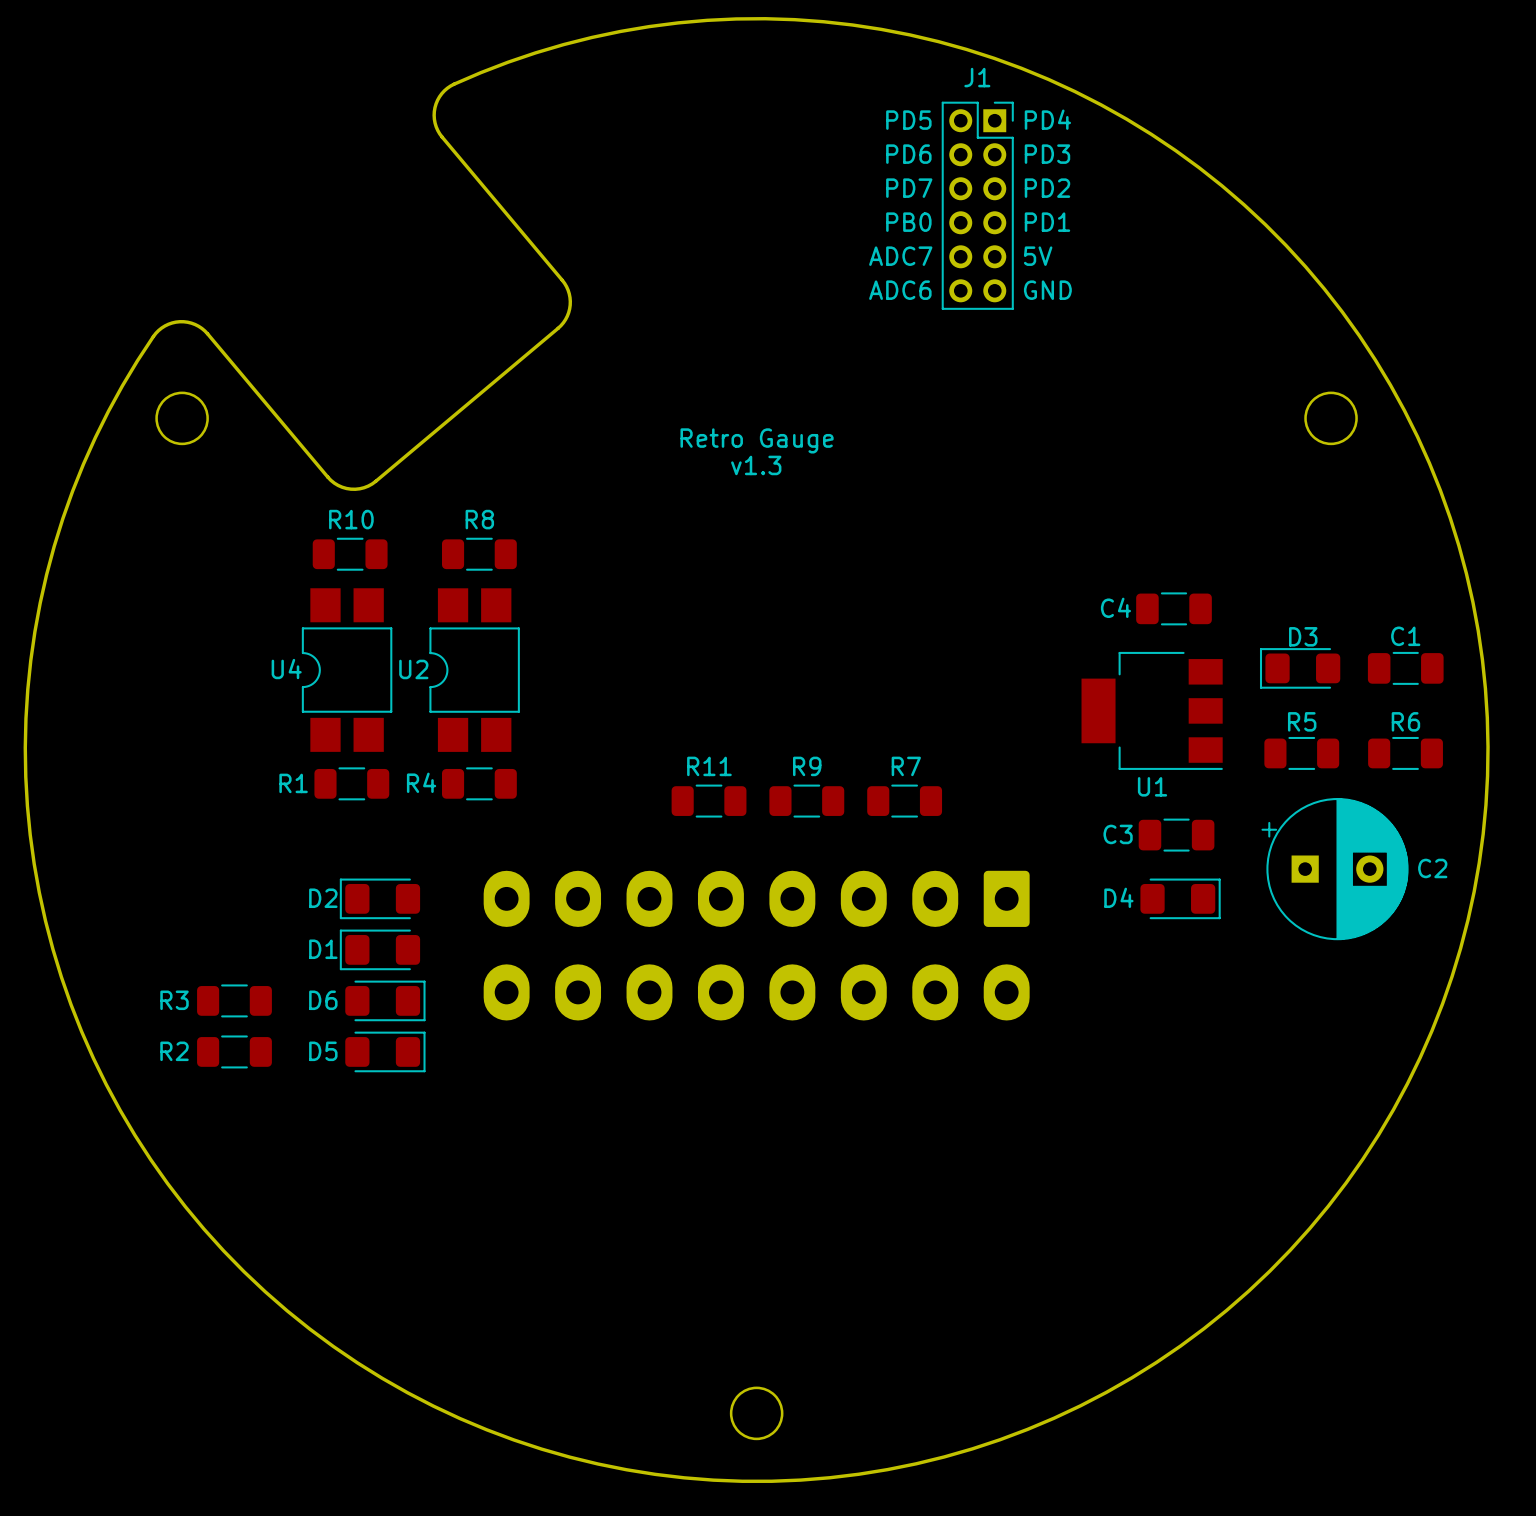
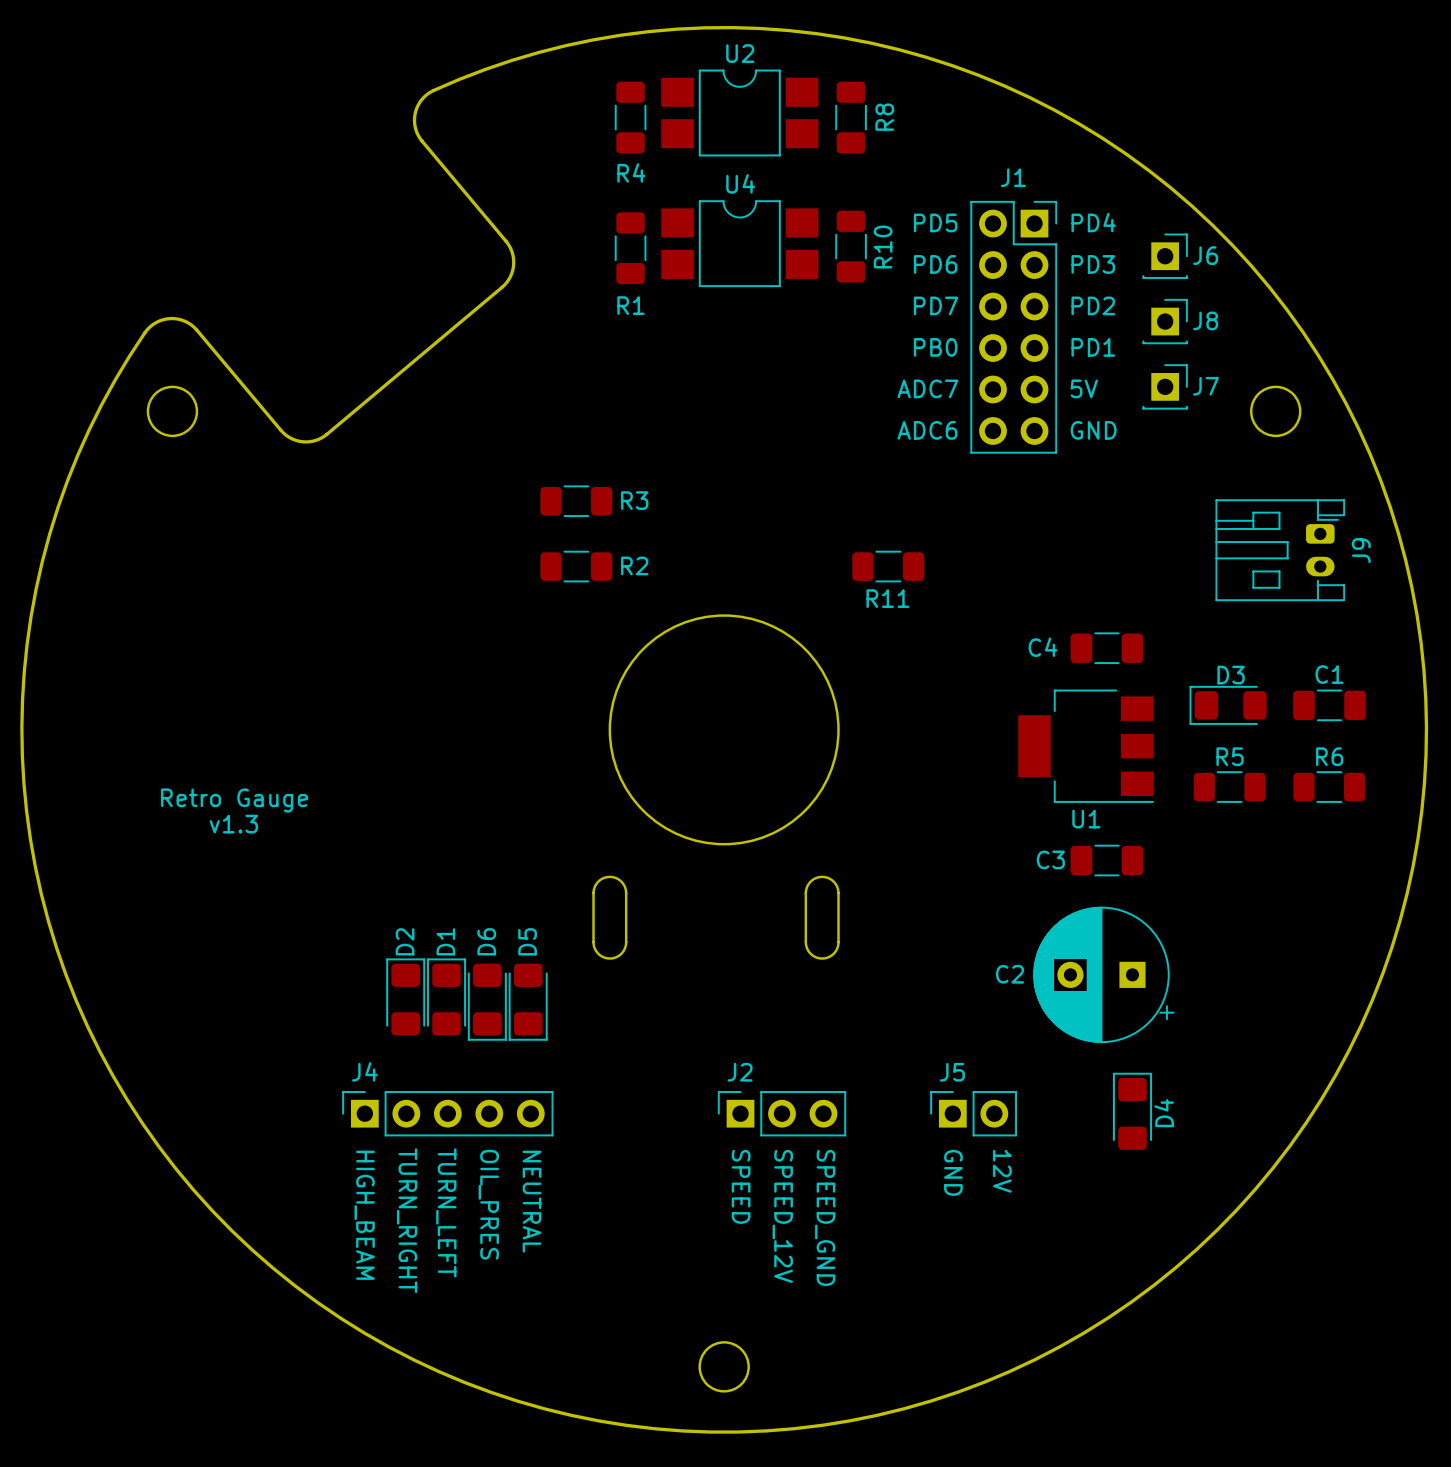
J1 footprint: [941, 101, 1014, 310] -> [970, 200, 1058, 454]
text position: PD4 (1047, 119) -> PD4 (1093, 222)
text position: PD5 (908, 120) -> PD5 (935, 222)
text position: PD6 (908, 154) -> PD6 (935, 264)
text position: PD3 (1047, 154) -> PD3 (1093, 264)
text position: PD7 (909, 188) -> PD7 (936, 305)
text position: PD2 (1047, 188) -> PD2 (1093, 305)
text position: PB0 (908, 222) -> PB0 (935, 347)
text position: PD1 (1047, 222) -> PD1 (1093, 347)
board edge: (529, 241) (562, 280) (568, 290) (570, 301) (568, 312) (558, 328) (368, 486) (350, 489) (334, 483) (295, 438) -> (506, 241) (512, 252) (513, 265) (510, 277) (502, 287) (323, 436) (313, 440) (303, 441) (292, 439) (280, 430)
text position: ADC7 (900, 256) -> ADC7 (927, 388)
text position: 5V (1038, 256) -> 5V (1084, 388)
J6: none -> (1165, 256)
text position: ADC6 (900, 290) -> ADC6 (927, 430)
text position: GND (1047, 290) -> GND (1093, 430)
J8: none -> (1165, 321)
J7: none -> (1165, 386)
text: Retro Gauge (757, 440) -> none
text: v1.3 (756, 465) -> none
R10 rotation: 0° (350, 554) -> 90° clockwise (851, 246)
R10 position: (350, 554) -> (851, 246)
R8 rotation: 0° (479, 554) -> 90° clockwise (851, 117)
R8 position: (479, 554) -> (851, 117)
J9: none -> (1280, 550)
C4 name position: C4 (1115, 607) -> C4 (1043, 647)
C4 position: (1174, 608) -> (1106, 648)
round board edge: none -> [608, 614, 840, 846]
D3 position: (1300, 668) -> (1228, 705)
C1 position: (1405, 668) -> (1329, 705)
U4 rotation: 0° (347, 670) -> 90° clockwise (739, 243)
U4 position: (347, 670) -> (739, 243)
U2 rotation: 0° (474, 670) -> 90° clockwise (739, 112)
U2 position: (474, 670) -> (739, 112)
U1 position: (1152, 710) -> (1086, 746)
R5 position: (1301, 753) -> (1229, 787)
R6 position: (1405, 753) -> (1329, 787)
R11 name position: R11 (709, 766) -> R11 (887, 598)
R4 name position: R4 (421, 782) -> R4 (631, 172)
R1 name position: R1 (293, 783) -> R1 (630, 305)
R1 rotation: 0° (351, 783) -> 90° clockwise (630, 248)
R1 position: (351, 783) -> (630, 248)
R4 rotation: 0° (479, 783) -> 90° clockwise (630, 117)
R4 position: (479, 783) -> (630, 117)
R11 position: (709, 801) -> (888, 566)
R9: (806, 801) -> none
R7: (904, 801) -> none
text: none -> Retro Gauge (234, 800)
C3 position: (1176, 835) -> (1106, 860)
text: none -> v1.3 (233, 824)
C2 rotation: 0° (1335, 869) -> 180° (1103, 974)
C2 position: (1335, 869) -> (1103, 974)
D4 name position: D4 (1118, 897) -> D4 (1164, 1113)
D2 rotation: 0° (379, 898) -> 90° clockwise (405, 996)
D2 position: (379, 898) -> (405, 996)
D4 rotation: 0° (1180, 898) -> 90° counterclockwise (1132, 1111)
D4 position: (1180, 898) -> (1132, 1111)
board edge: none -> (593, 893) (594, 946) (601, 956) (614, 957) (622, 952) (626, 944) (625, 888) (619, 880) (607, 877) (596, 883) (593, 893)
board edge: none -> (805, 893) (806, 946) (814, 956) (826, 957) (835, 952) (838, 944) (837, 888) (832, 880) (820, 877) (809, 883) (805, 893)
part: (756, 945) -> none
D1 rotation: 0° (379, 949) -> 90° clockwise (446, 996)
D1 position: (379, 949) -> (446, 996)
R3 name position: R3 (174, 1000) -> R3 (634, 500)
R3 position: (234, 1000) -> (576, 501)
D6 rotation: 0° (385, 1000) -> 90° clockwise (487, 1002)
D6 position: (385, 1000) -> (487, 1002)
R2 name position: R2 (174, 1051) -> R2 (634, 565)
R2 position: (234, 1051) -> (576, 566)
D5 rotation: 0° (385, 1051) -> 90° clockwise (528, 1002)
D5 position: (385, 1051) -> (528, 1002)
J4: none -> (447, 1113)
J2: none -> (782, 1113)
J5: none -> (973, 1113)
text: none -> 12V (1002, 1171)
text: none -> GND (953, 1172)
text: none -> SPEED (741, 1186)
text: none -> NEUTRAL (532, 1201)
text: none -> OIL_PRES (488, 1204)
text: none -> TURN_LEFT (446, 1212)
text: none -> HIGH_BEAM (364, 1215)
text: none -> SPEED_12V (782, 1216)
text: none -> SPEED_GND (825, 1217)
text: none -> TURN_RIGHT (407, 1220)

